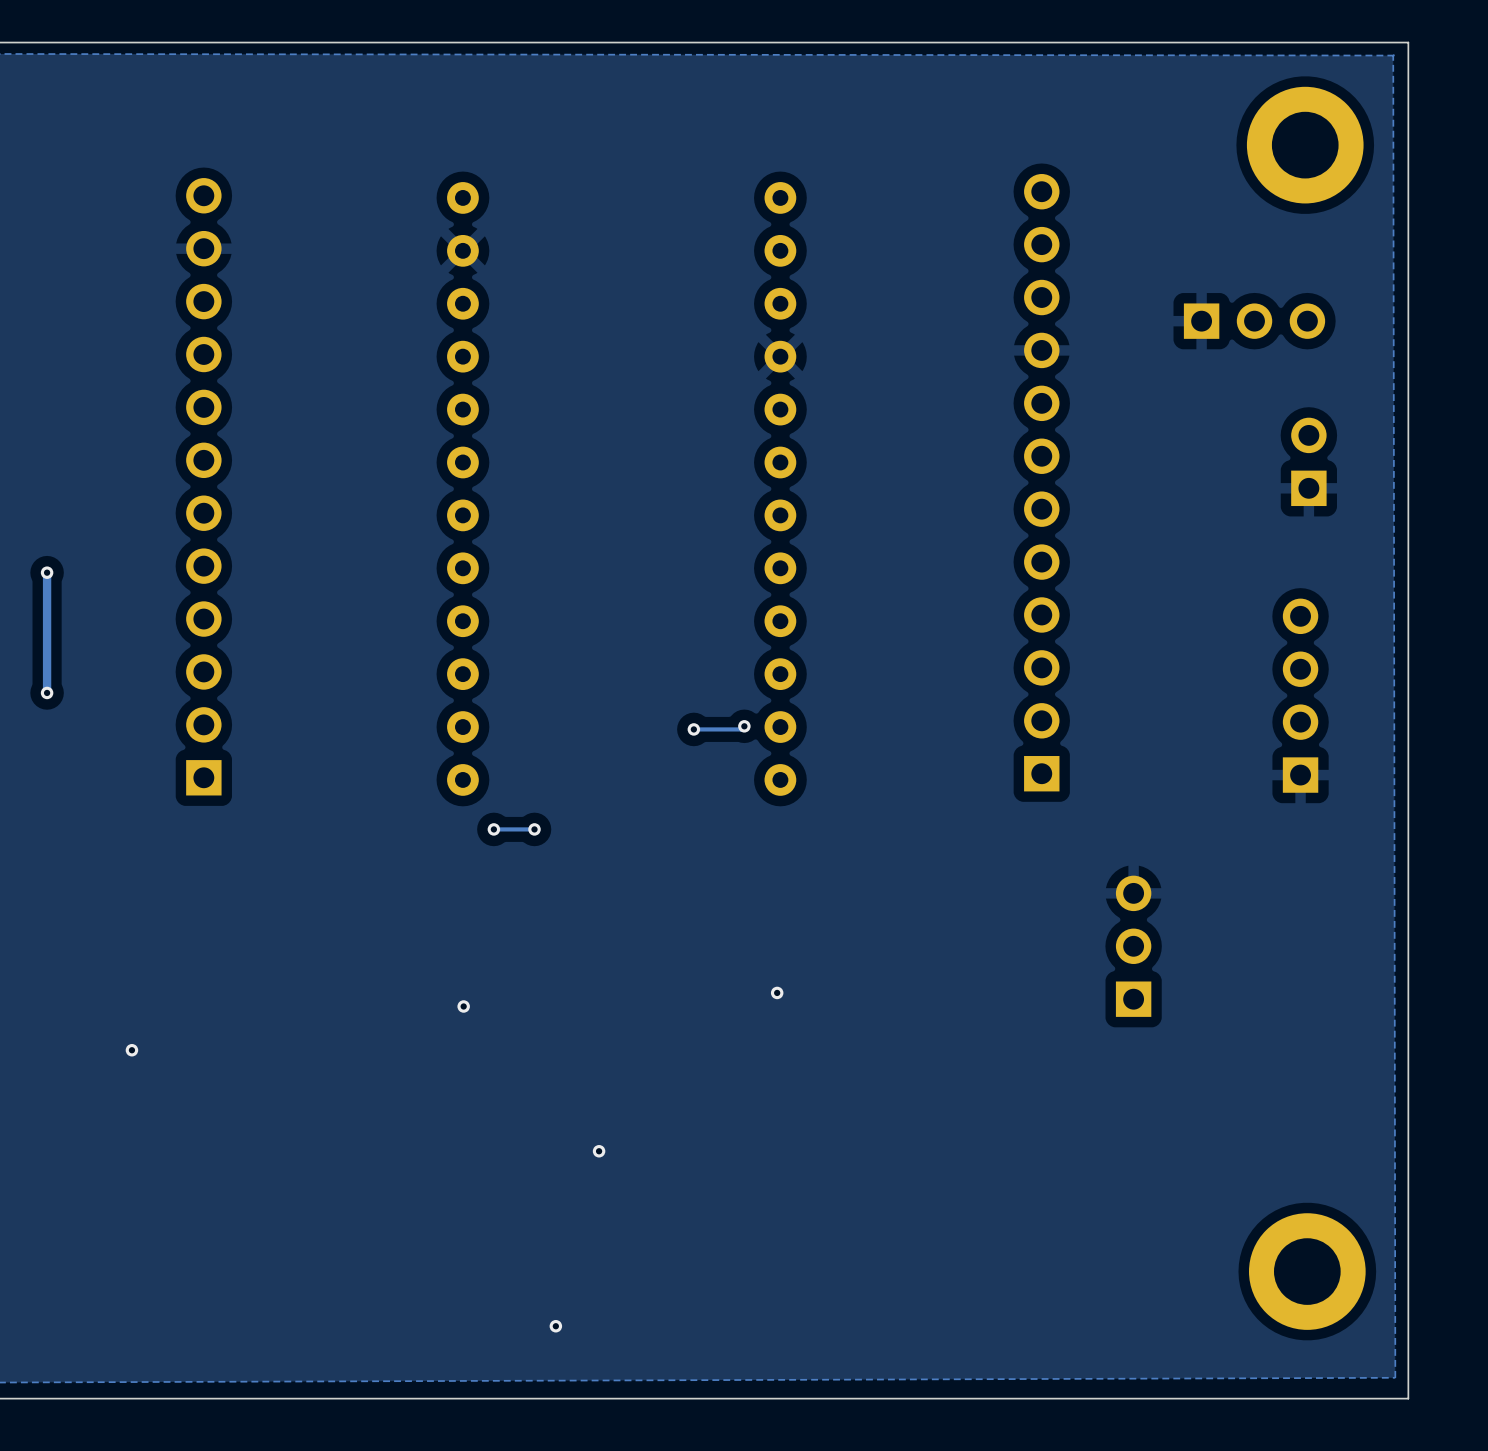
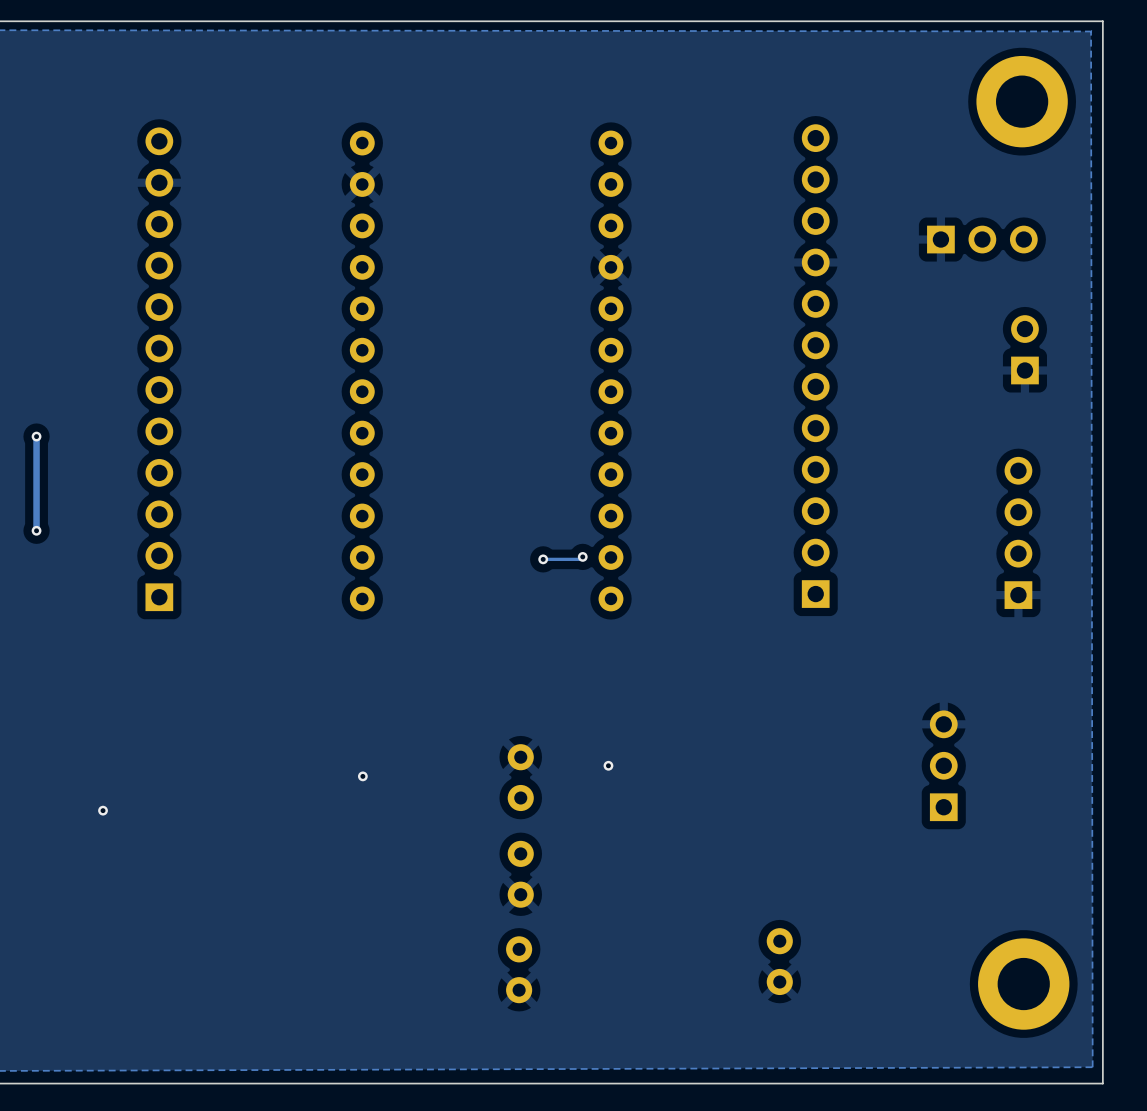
via: (493, 829) -> none
track: (534, 829) (493, 829) -> none
via: (534, 829) -> none
part position: (1133, 946) -> (943, 765)
part: none -> (520, 777)
part: none -> (520, 874)
via: (599, 1151) -> none
part: none -> (779, 961)
part: none -> (519, 969)
via: (555, 1326) -> none

